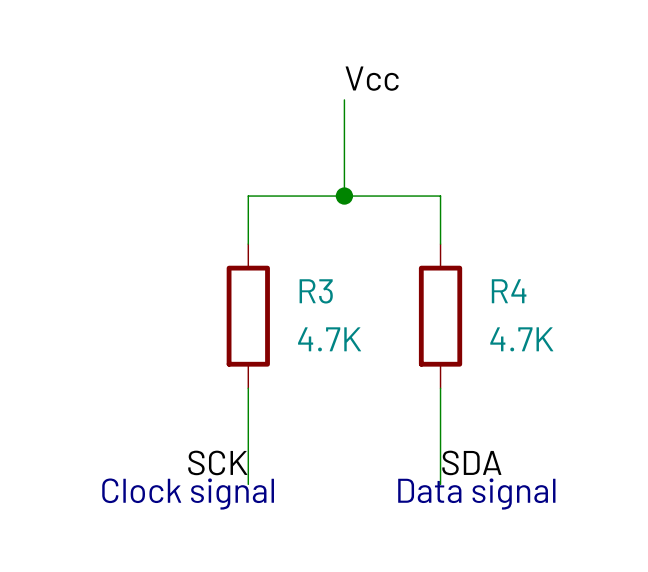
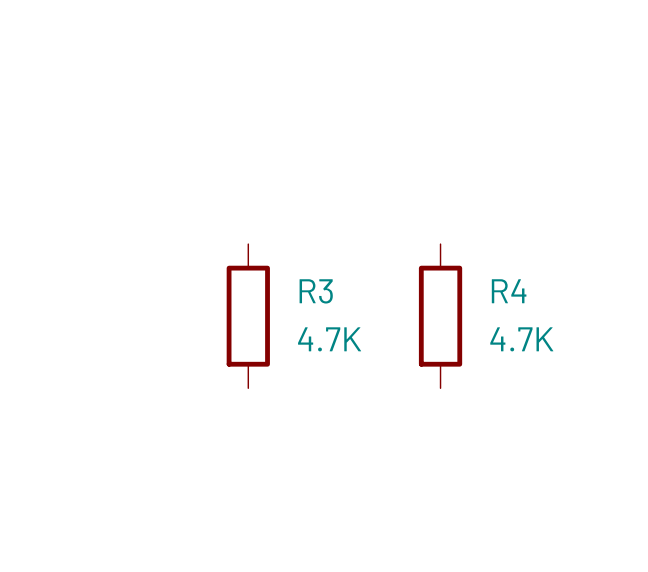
label: Vcc (372, 78) -> none
wire: (344, 99) (344, 196) -> none
junction: (344, 196) -> none
wire: (248, 244) (248, 196) (440, 196) (440, 244) -> none
wire: (248, 388) (248, 484) -> none
wire: (440, 388) (440, 484) -> none
label: SCK (217, 462) -> none
label: SDA (471, 462) -> none
text: Clock signal (188, 494) -> none
text: Data signal (476, 494) -> none

